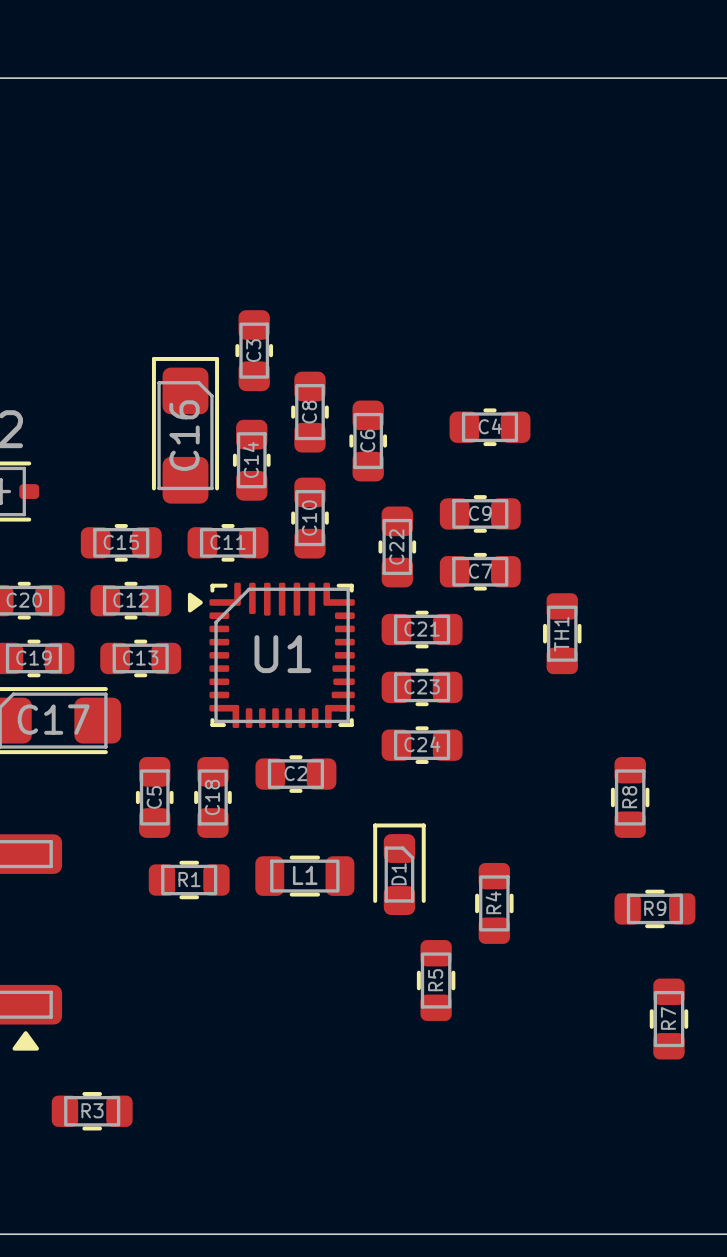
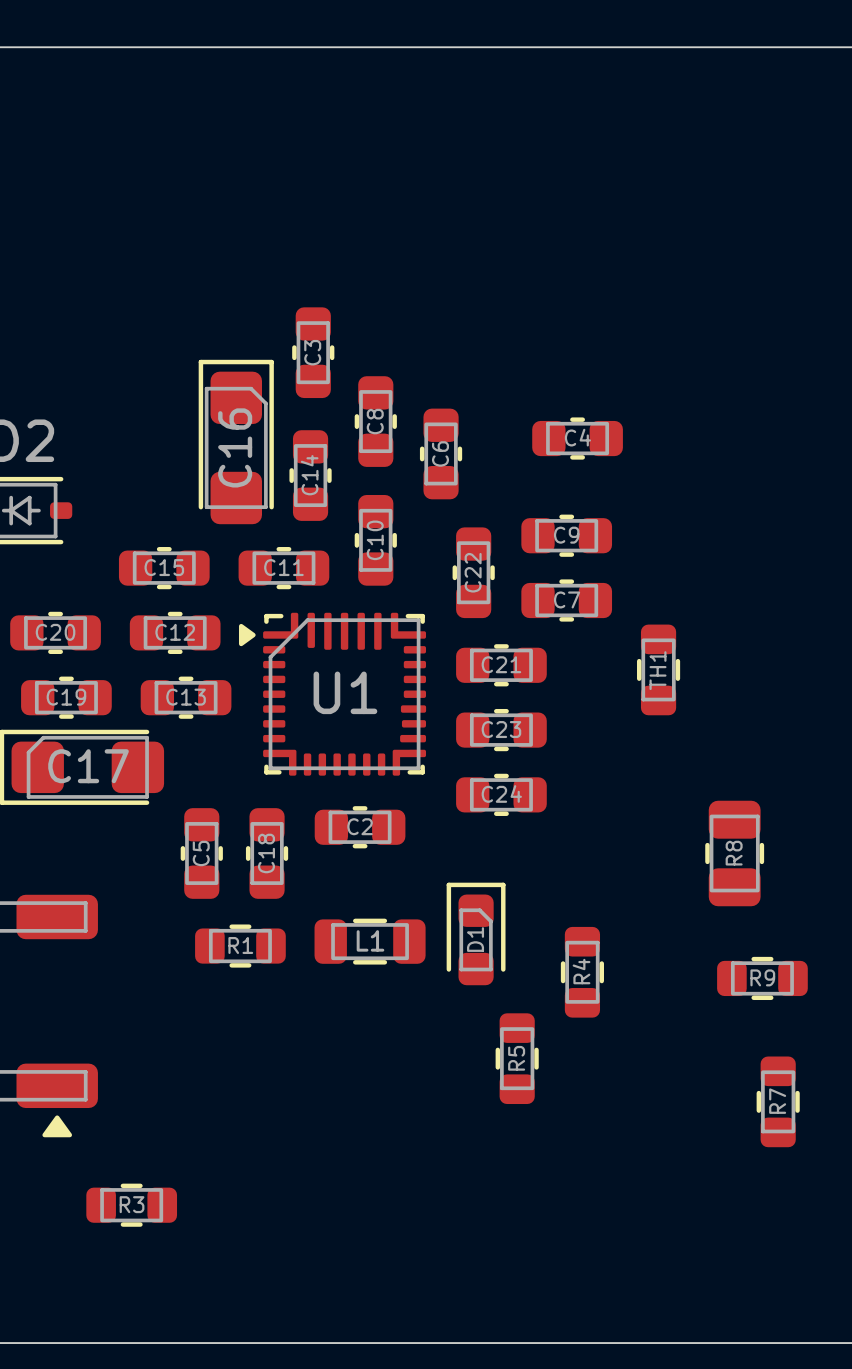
R8 footprint: [610, 756, 650, 838] -> [705, 800, 765, 907]

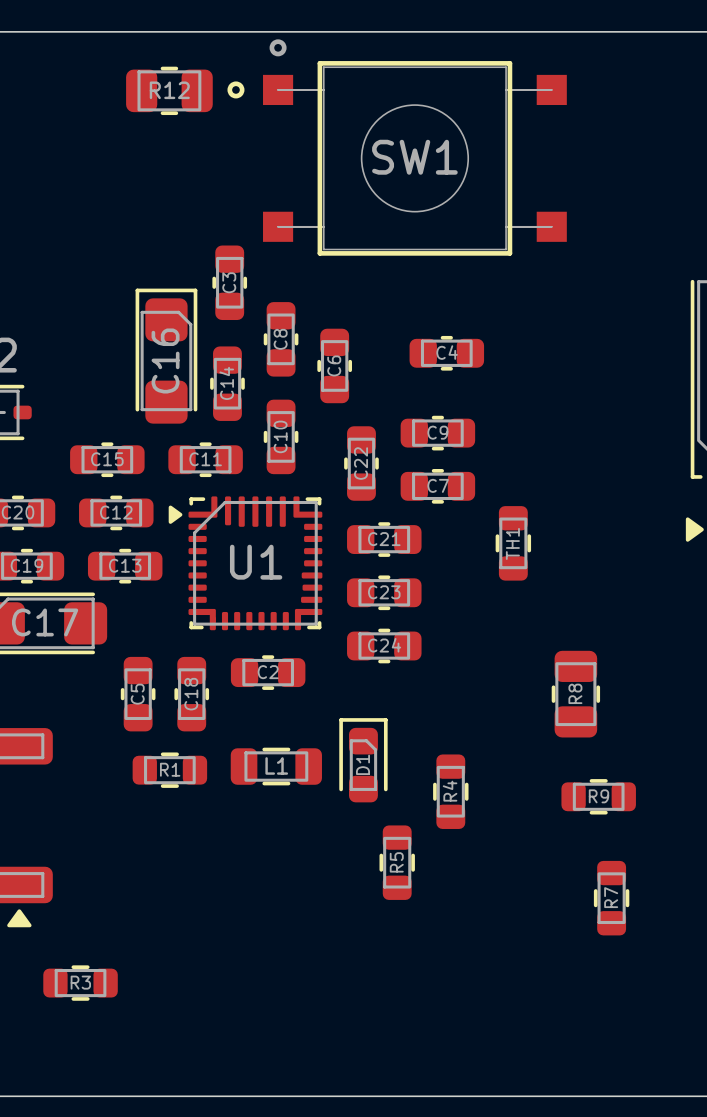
R12: none -> (169, 90)
SW1: none -> (397, 147)

